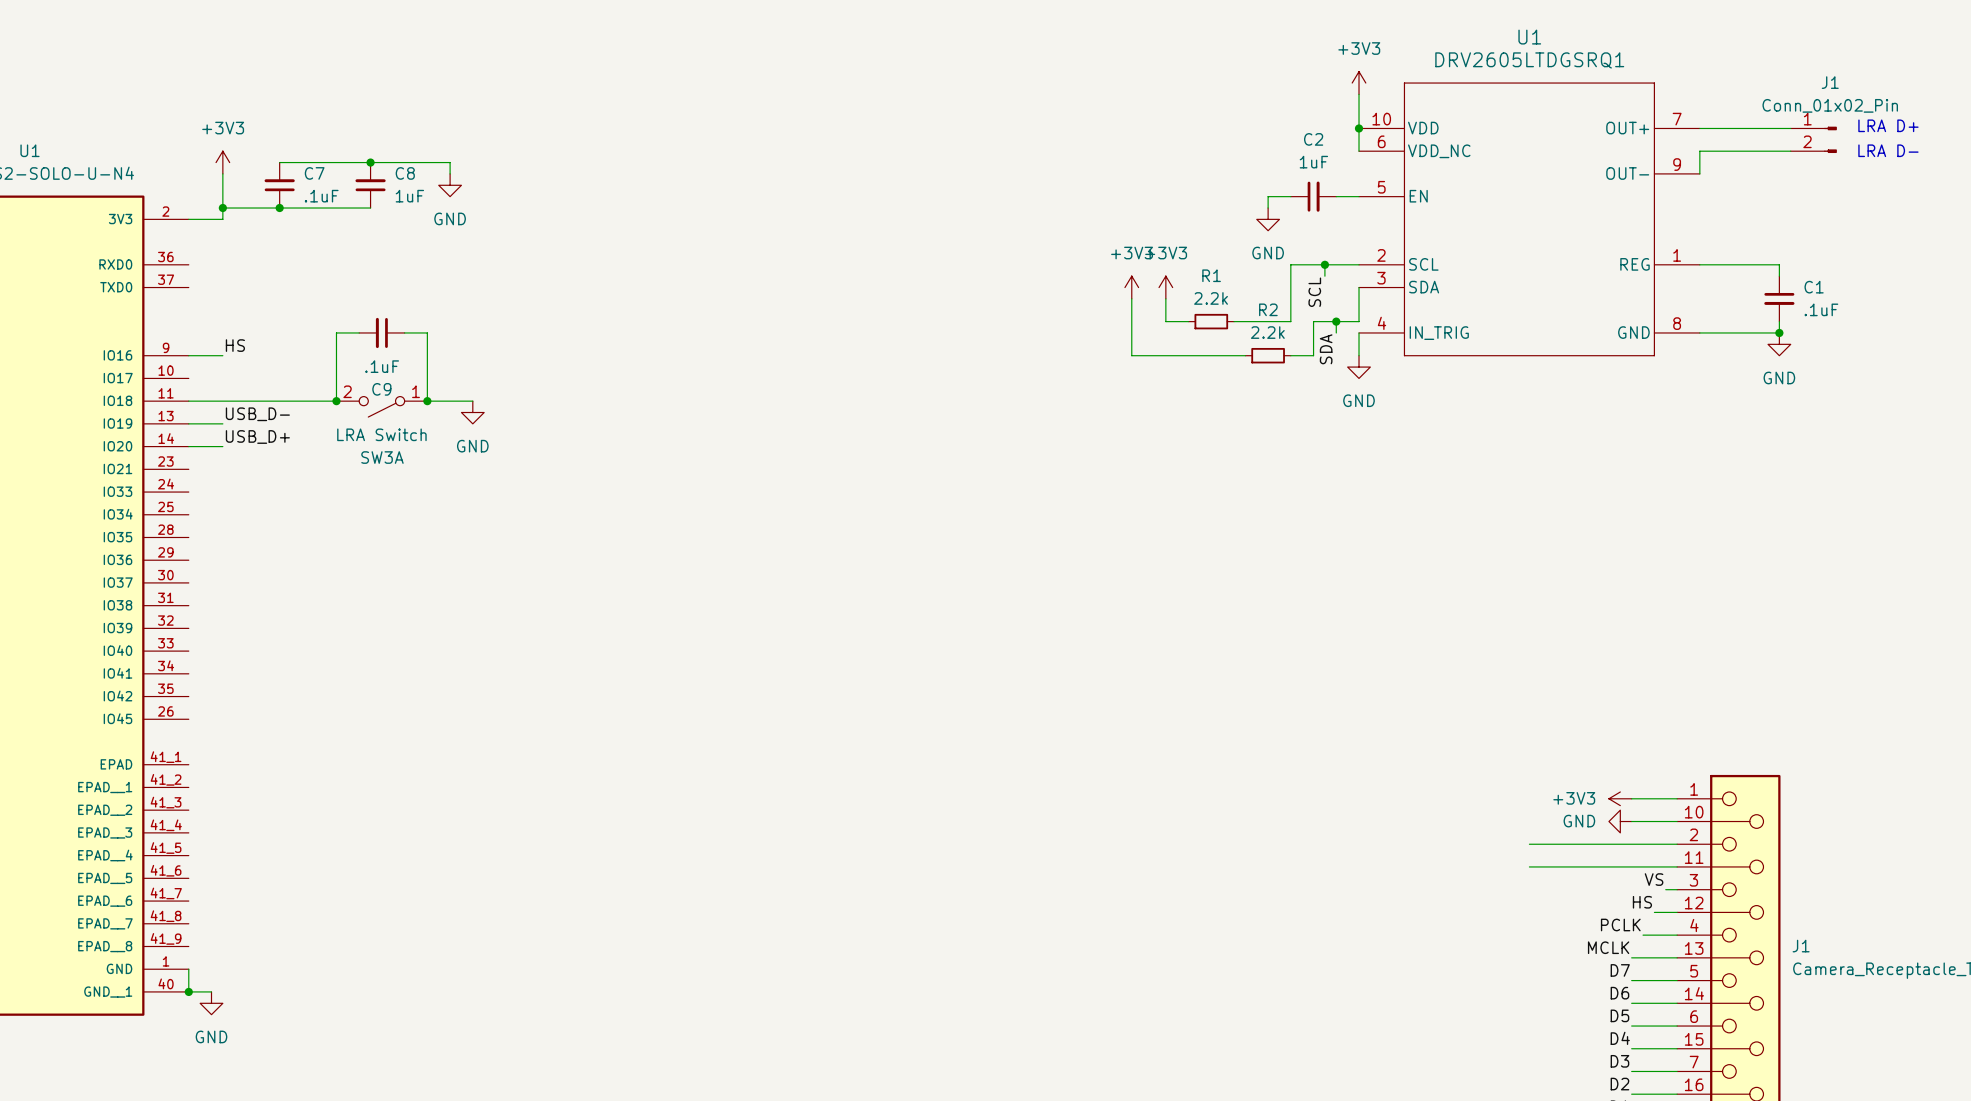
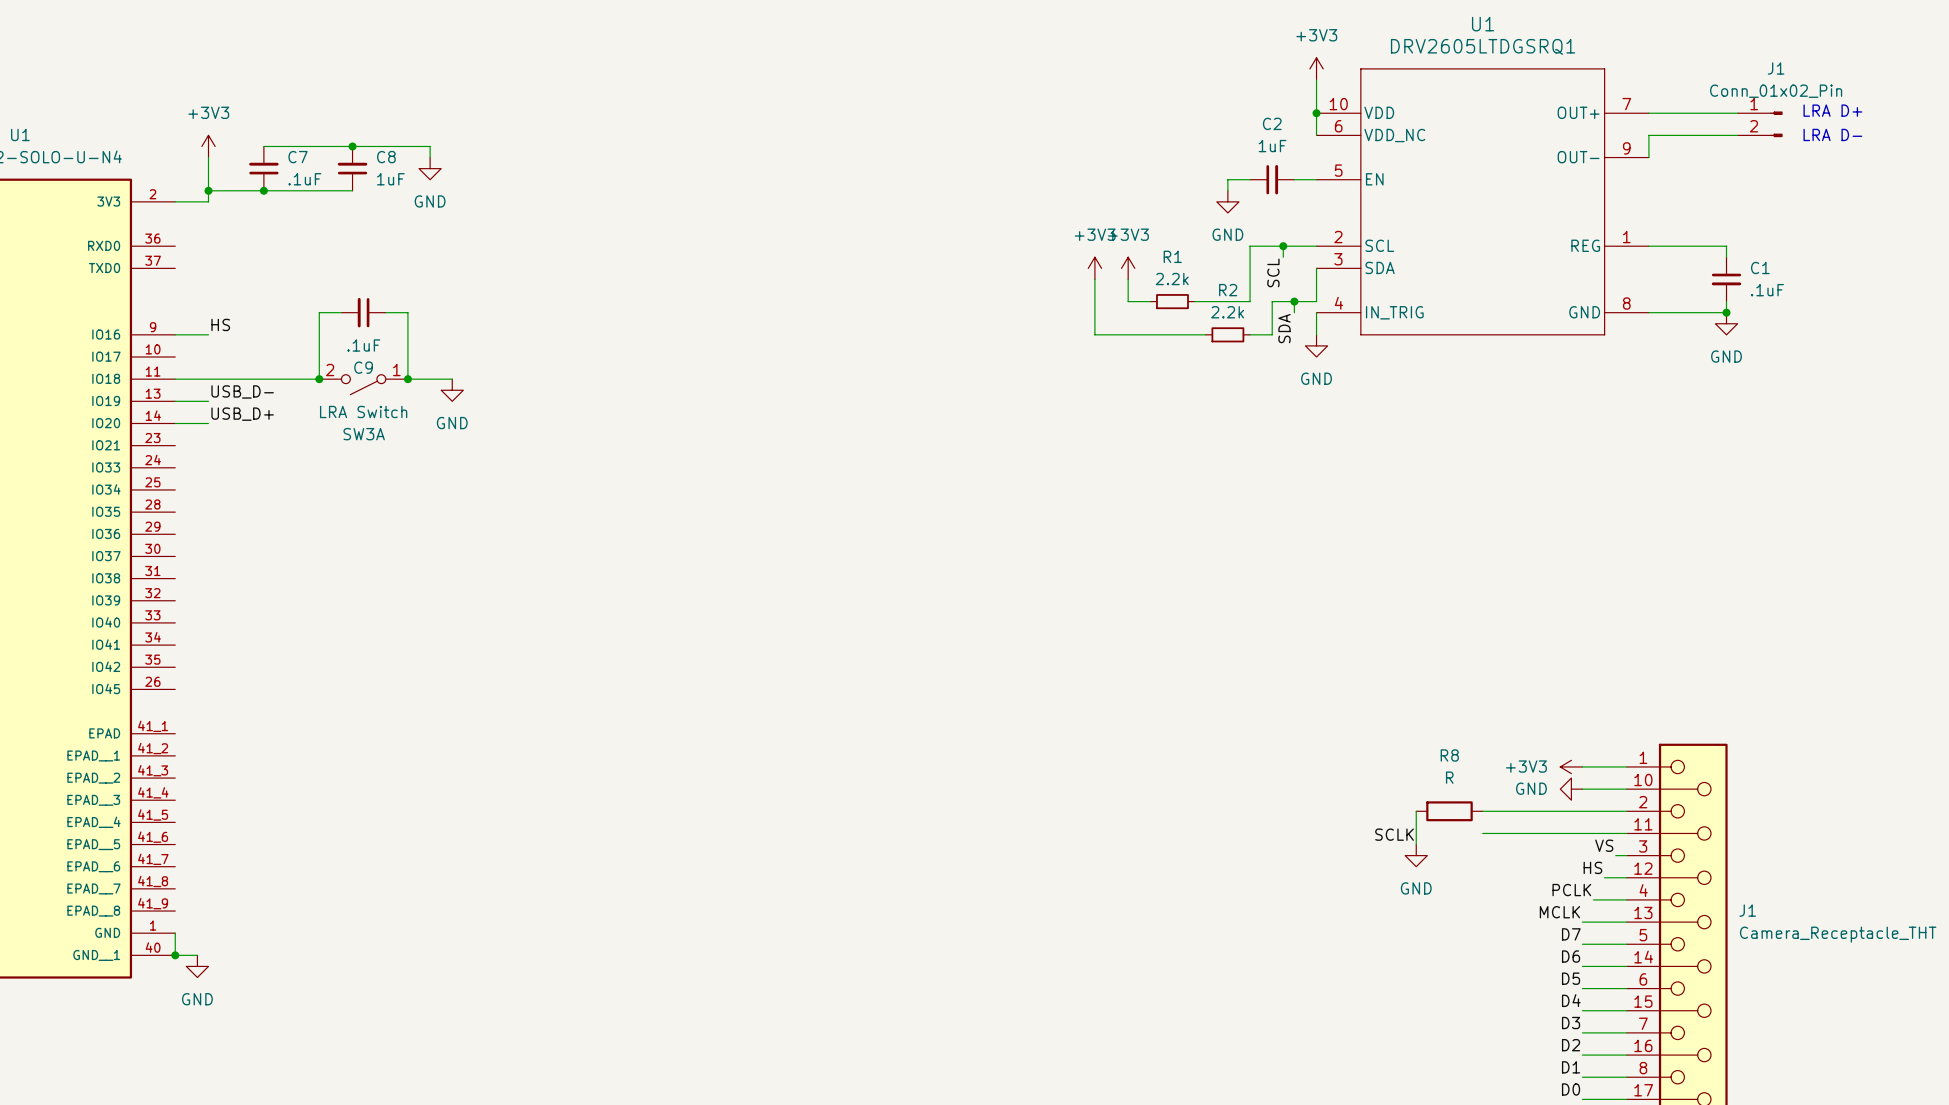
wire: none -> (1416, 811) (1416, 844)
R8: none -> R (1449, 811)
label: none -> SCLK (1394, 834)
power symbol: none -> GND (1416, 855)

